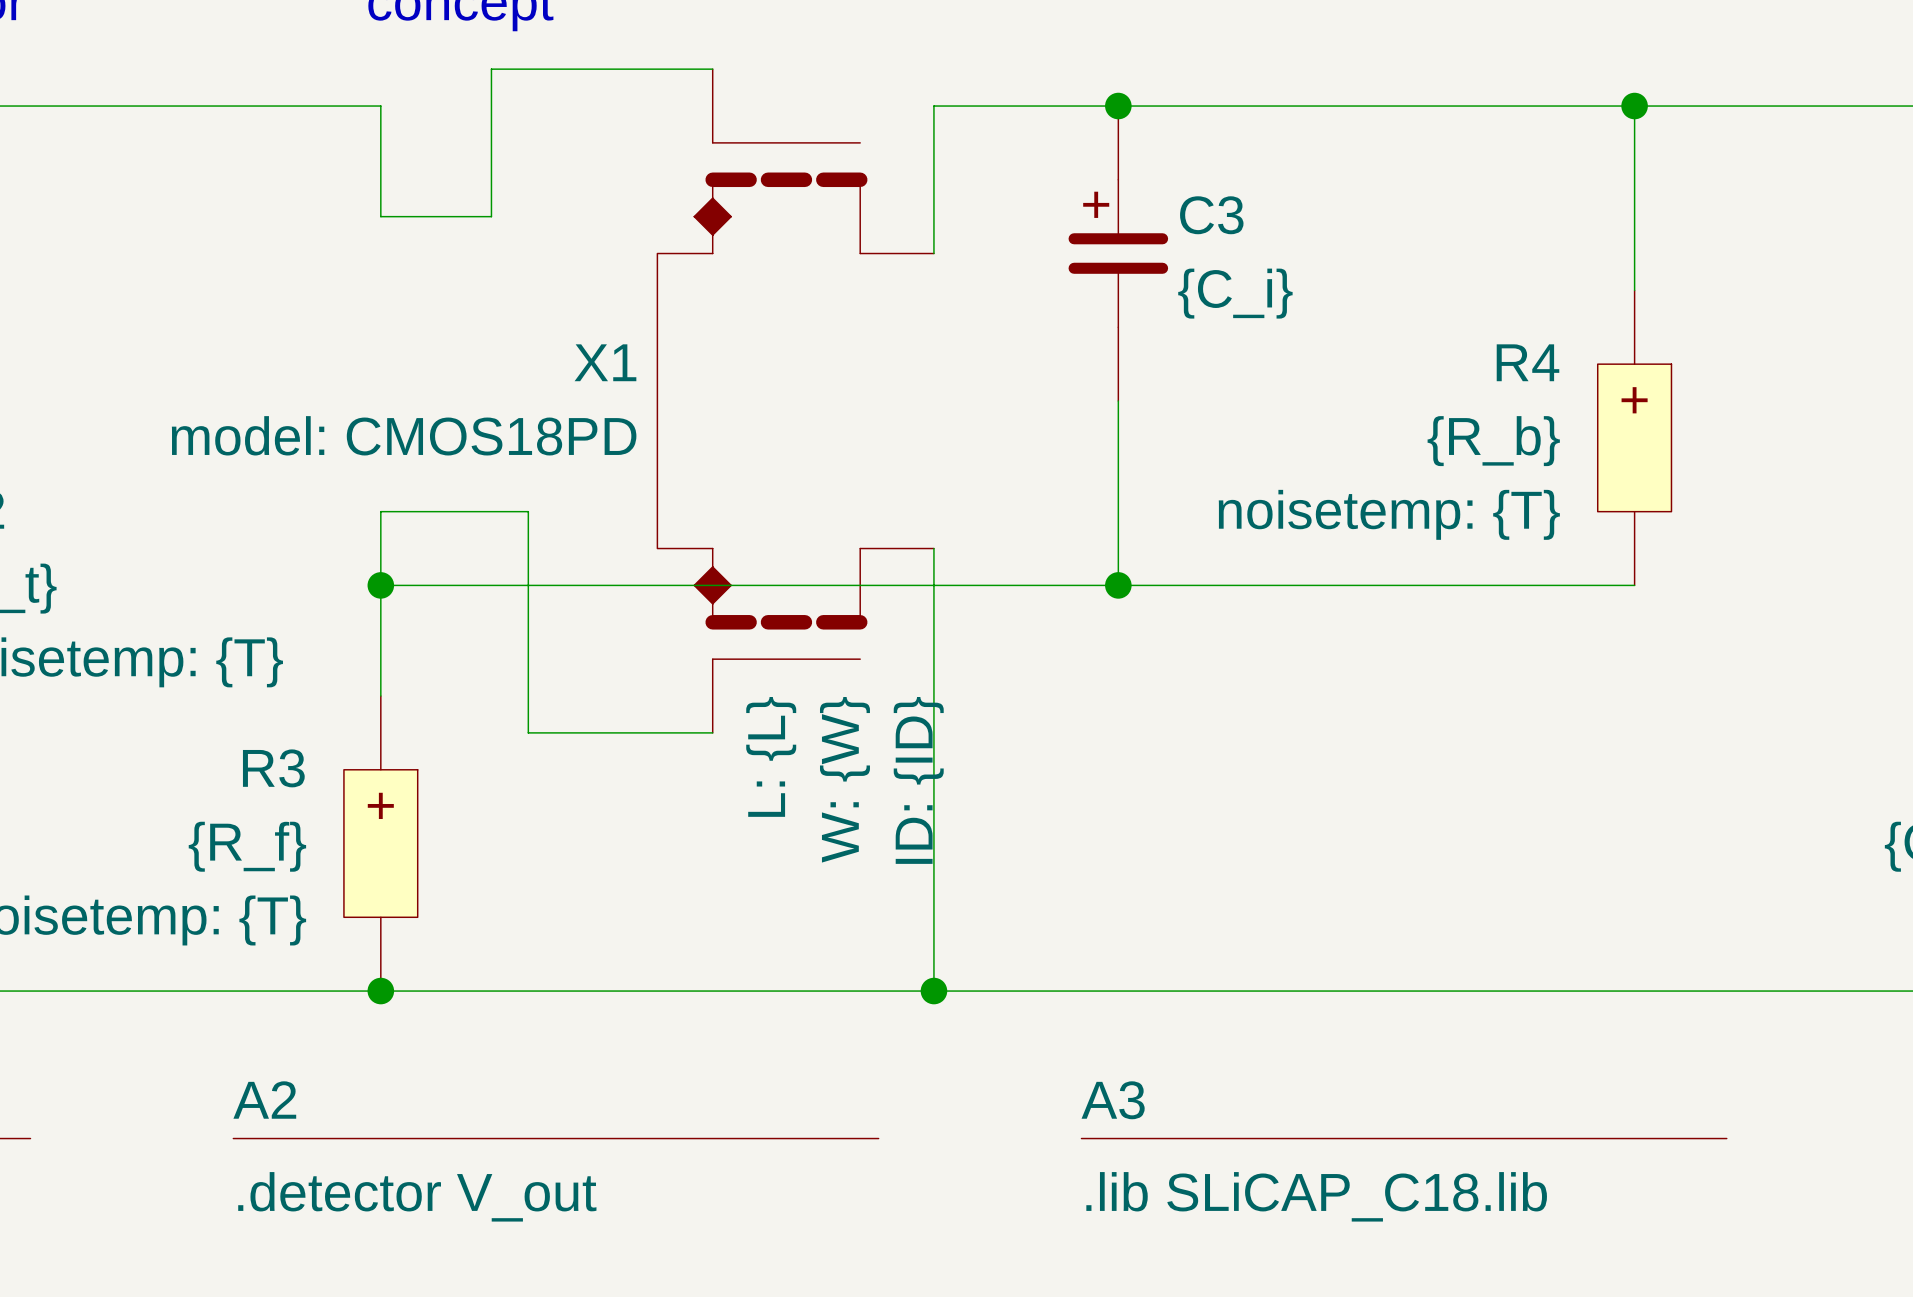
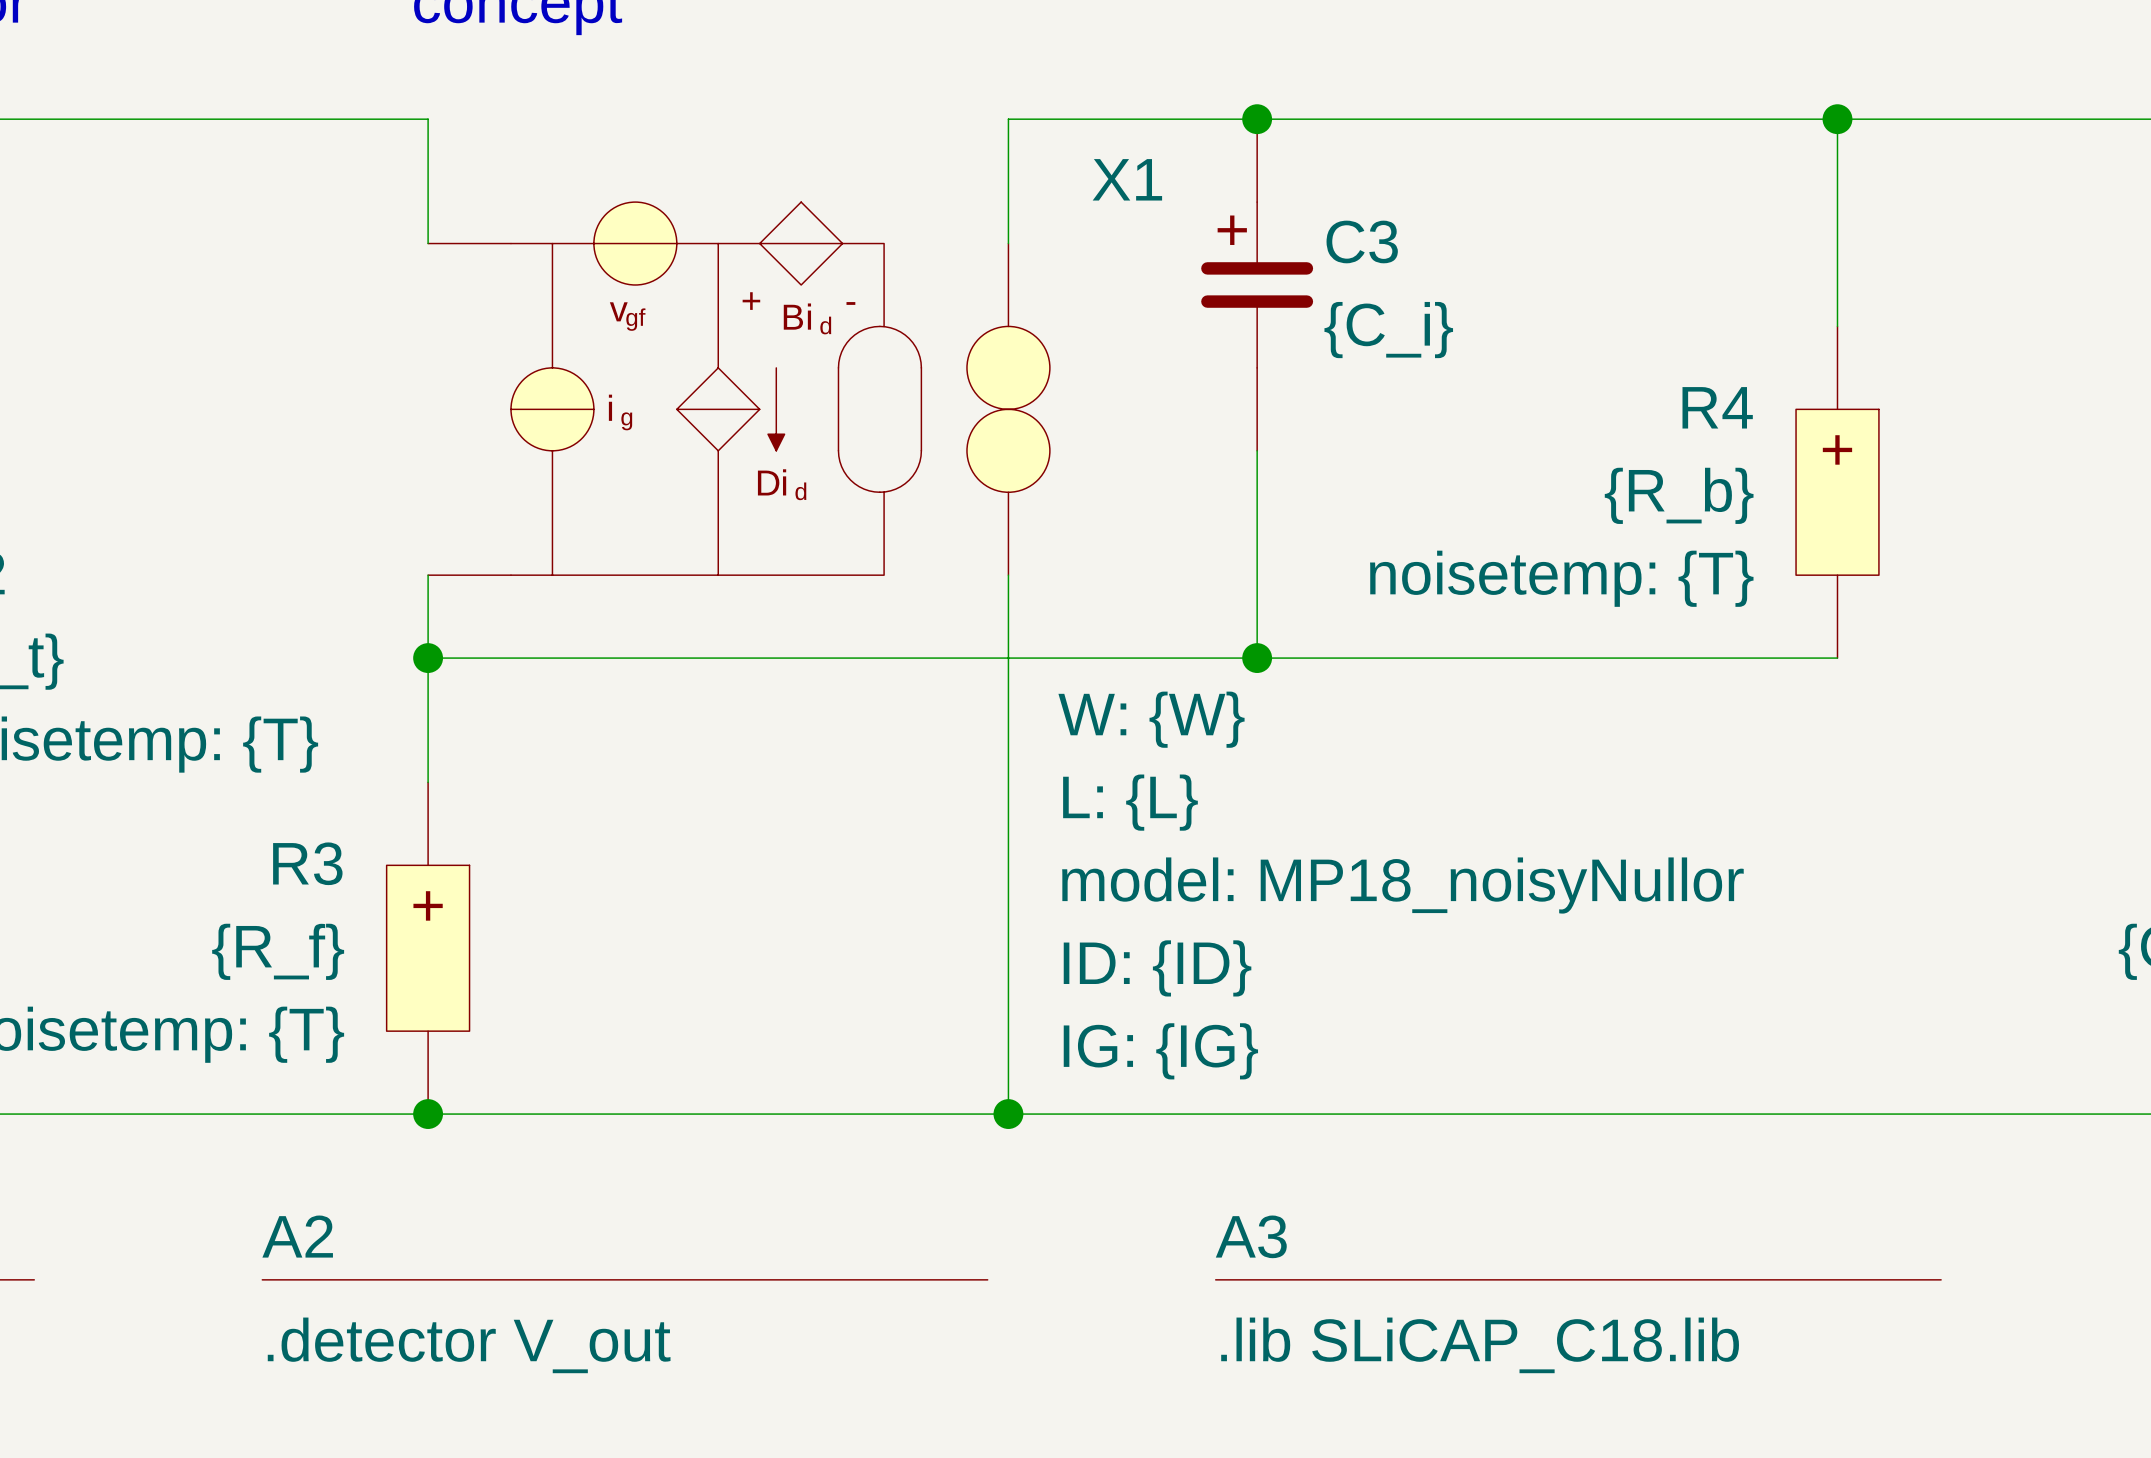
X1 symbol: [657, 69, 934, 733] -> [428, 202, 1050, 576]
wire: (712, 69) (491, 69) (491, 216) (380, 216) -> none
wire: (933, 106) (933, 253) -> (1049, 119) (1008, 119) (1008, 243)
X1 name position: X1 (605, 362) -> X1 (1127, 179)
X1 text: model: CMOS18PD (404, 435) -> model: MP18_noisyNullor (1402, 885)
wire: (380, 511) (528, 511) (528, 732) (712, 732) -> none
wire: none -> (1008, 575) (1008, 1114)
wire: (933, 548) (933, 991) -> none
X1 text position: L: {L} (771, 756) -> L: {L} (1130, 802)
X1 text position: W: {W} (844, 779) -> W: {W} (1151, 719)
X1 text position: ID: {ID} (918, 780) -> ID: {ID} (1157, 968)
X1 text: none -> IG: {IG} (1160, 1051)
junction position: (933, 991) -> (1008, 1114)

